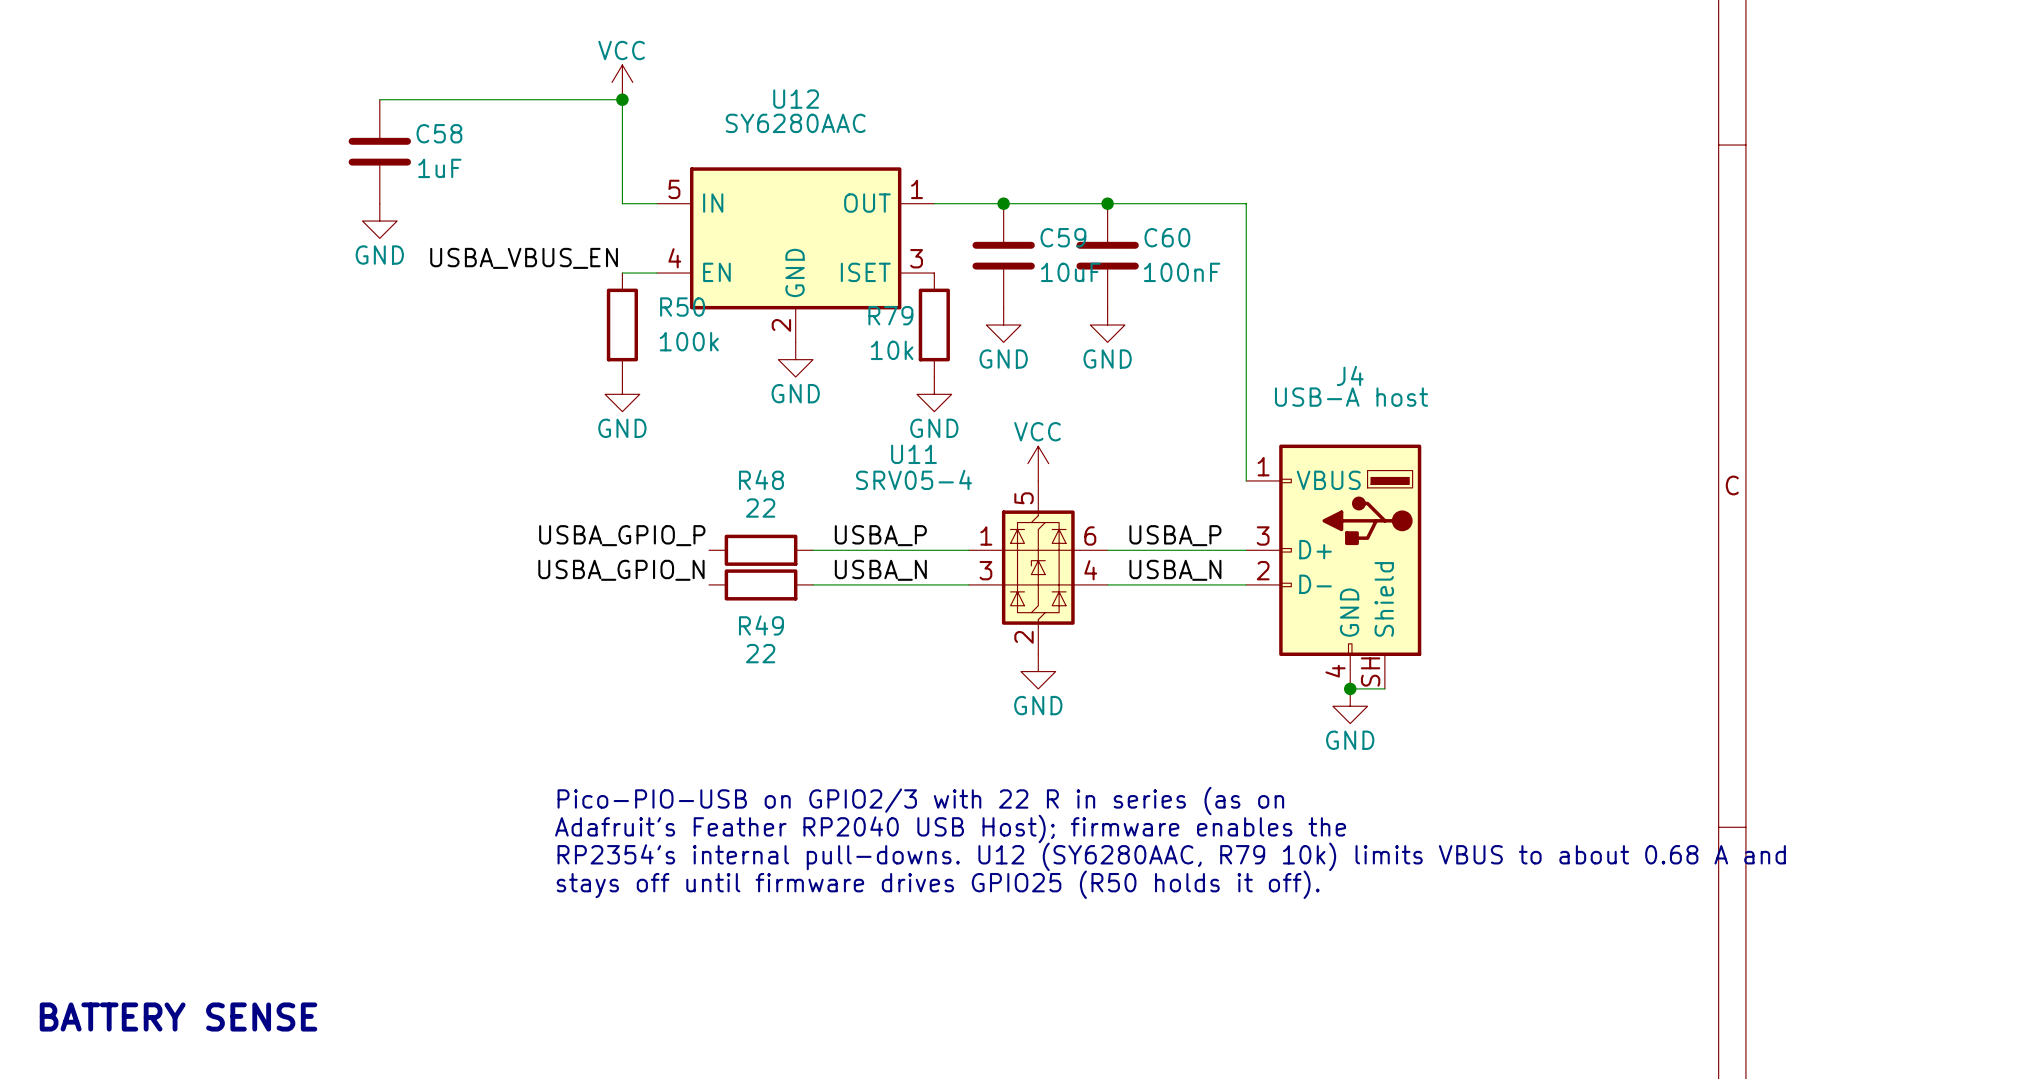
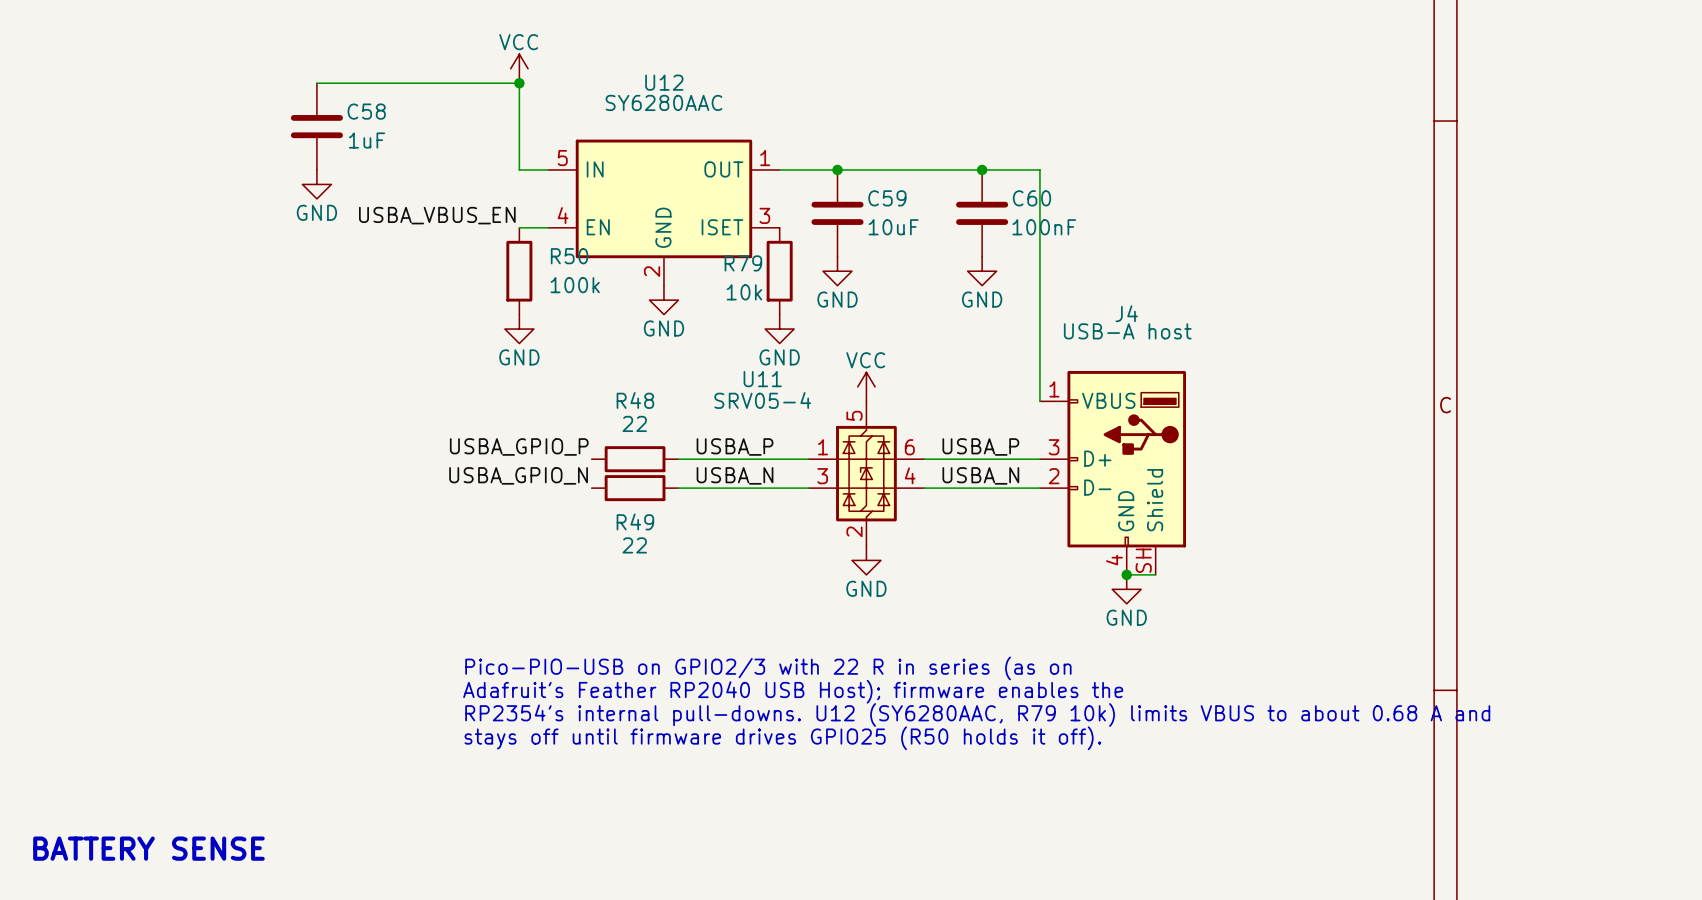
junction position: (1107, 203) -> (982, 169)
C60 position: (1107, 255) -> (982, 213)
power symbol position: GND (1107, 325) -> GND (982, 271)

